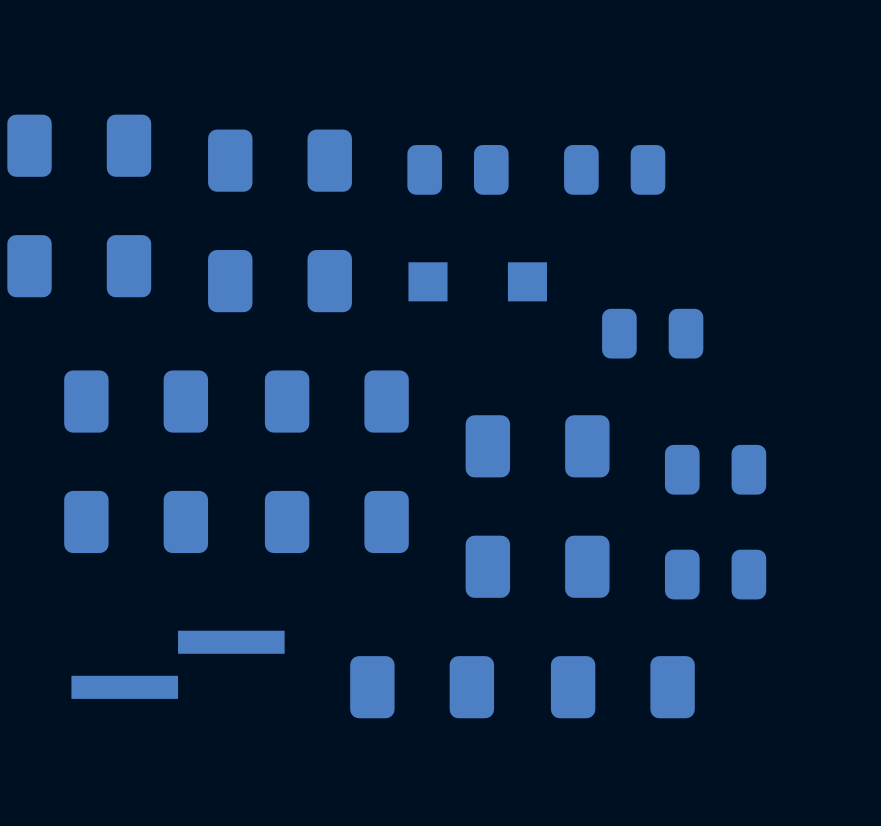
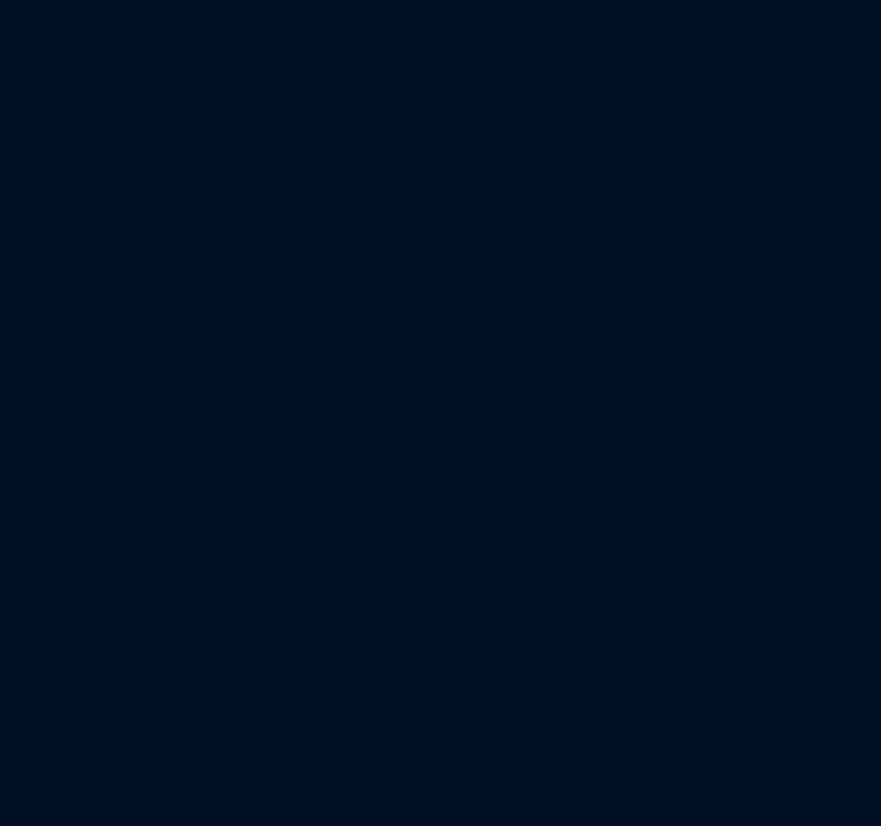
part: (79, 145) -> none
part: (280, 160) -> none
part: (458, 169) -> none
part: (614, 169) -> none
part: (79, 266) -> none
part: (280, 281) -> none
part: (477, 281) -> none
part: (652, 333) -> none
part: (136, 401) -> none
part: (336, 401) -> none
part: (537, 446) -> none
part: (715, 469) -> none
part: (136, 521) -> none
part: (336, 521) -> none
part: (537, 566) -> none
part: (715, 574) -> none
part: (178, 664) -> none
part: (422, 687) -> none
part: (622, 687) -> none

